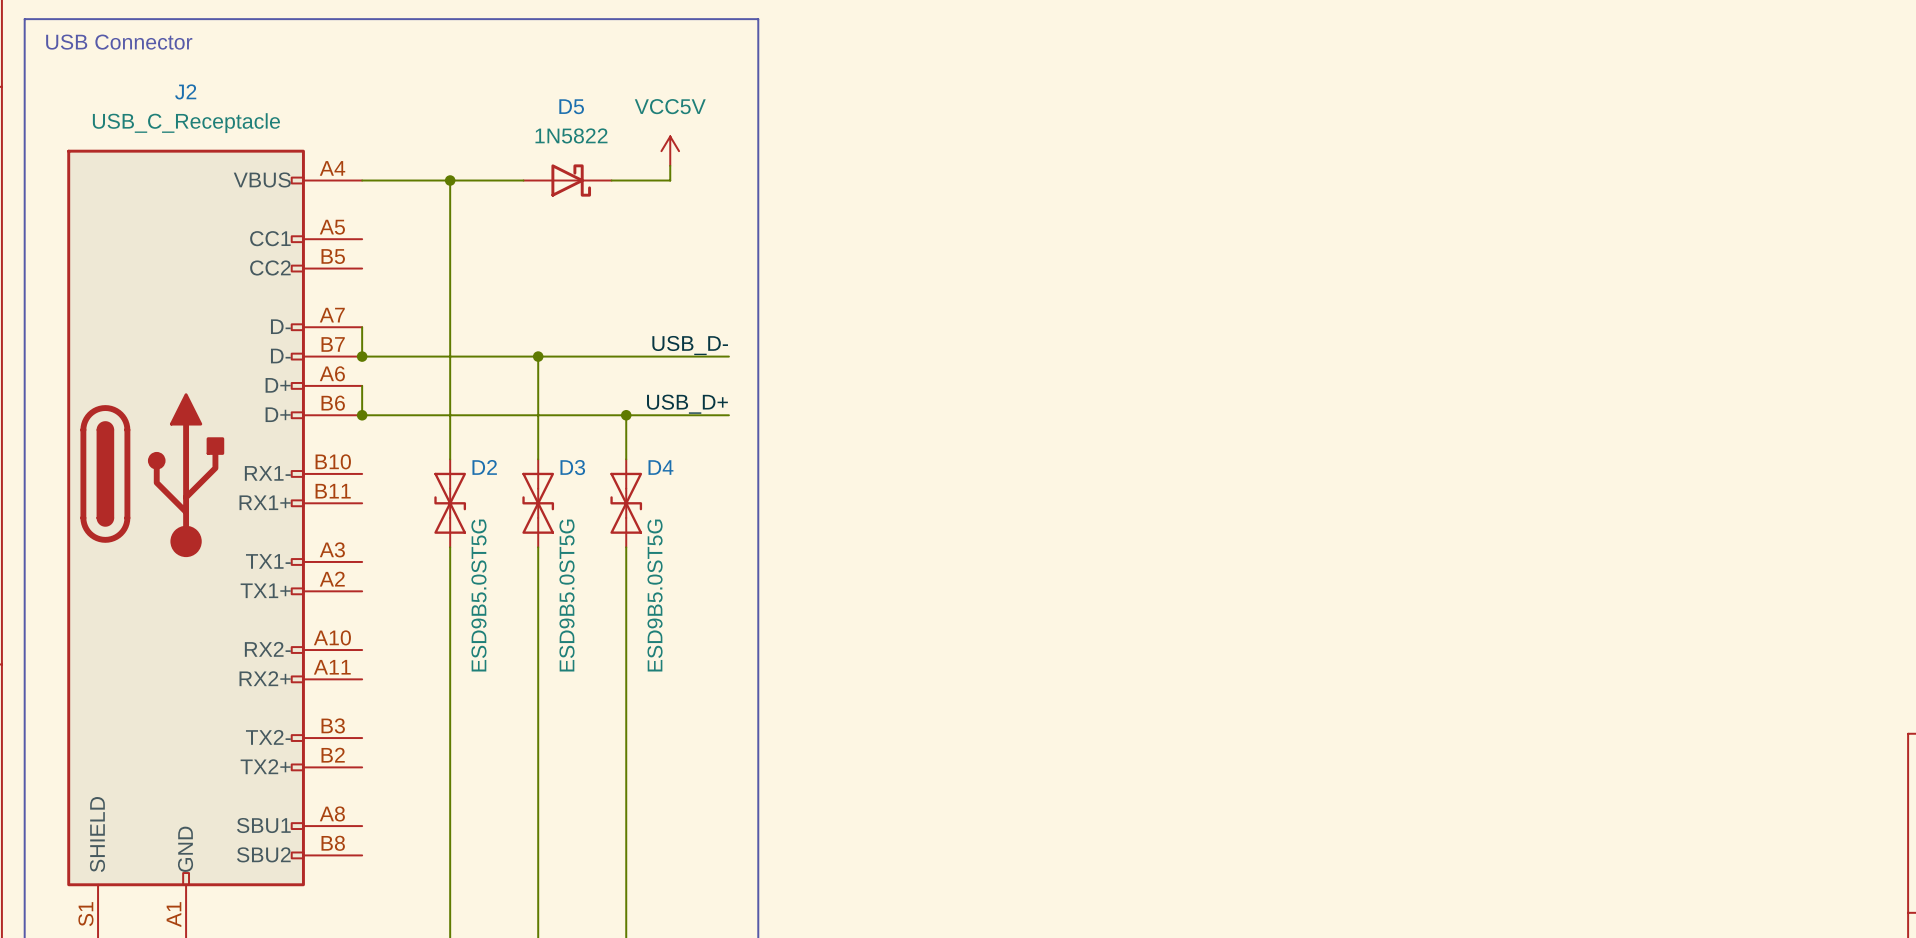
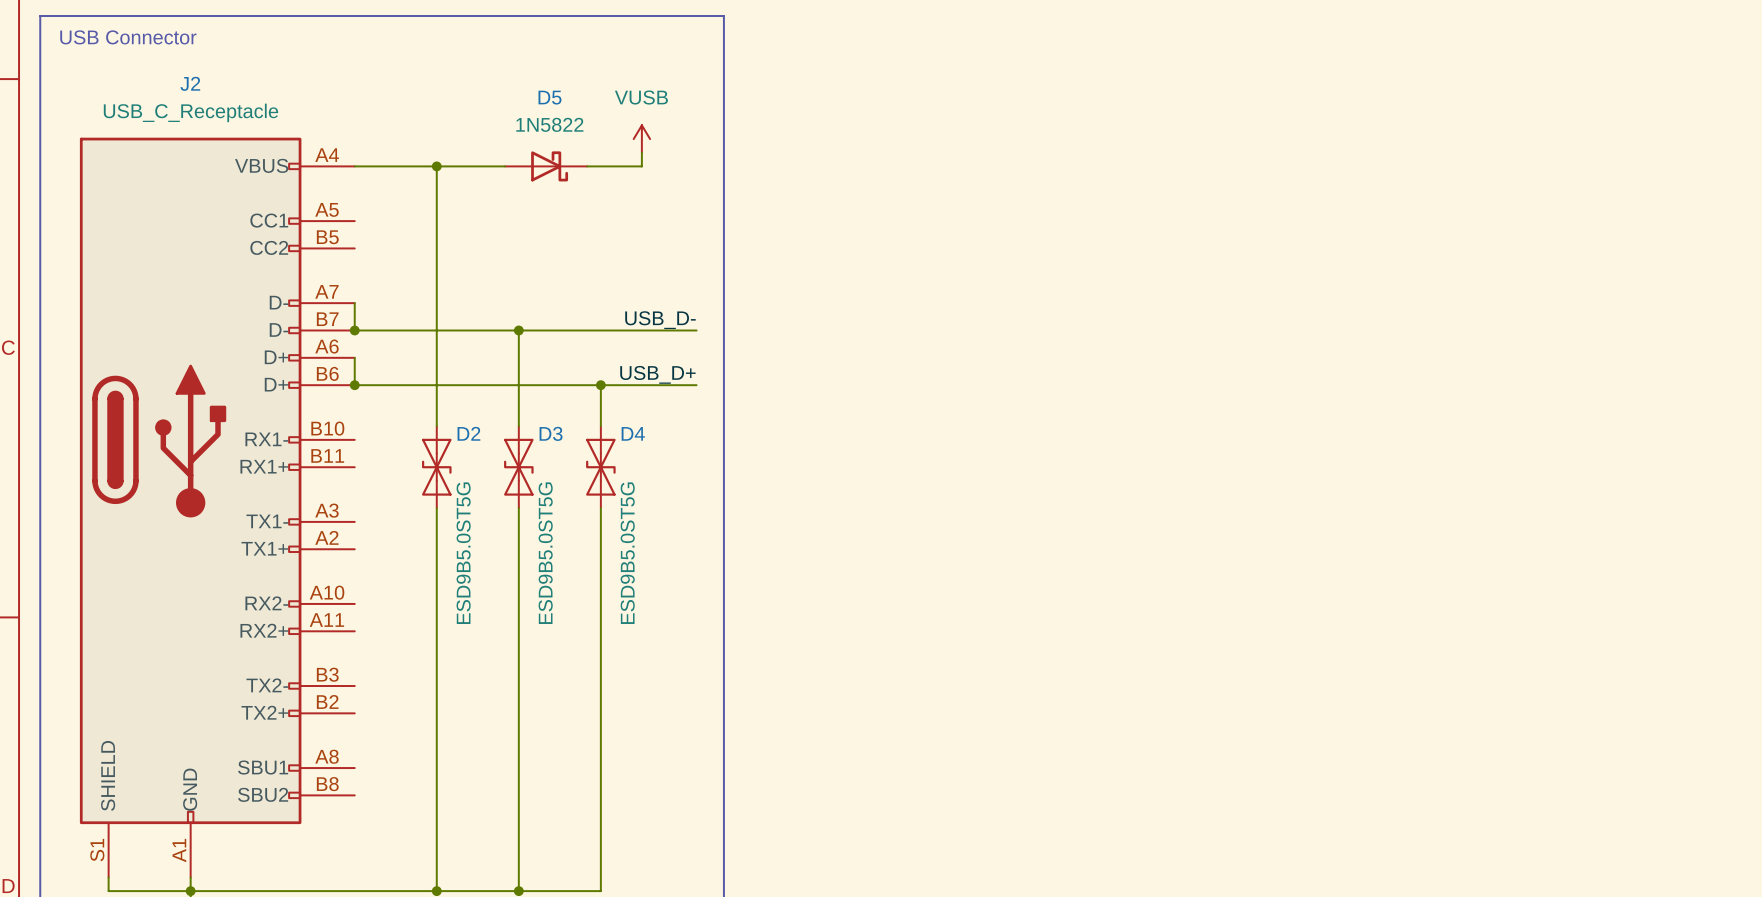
power symbol: VCC5V (670, 151) -> VUSB (641, 139)

